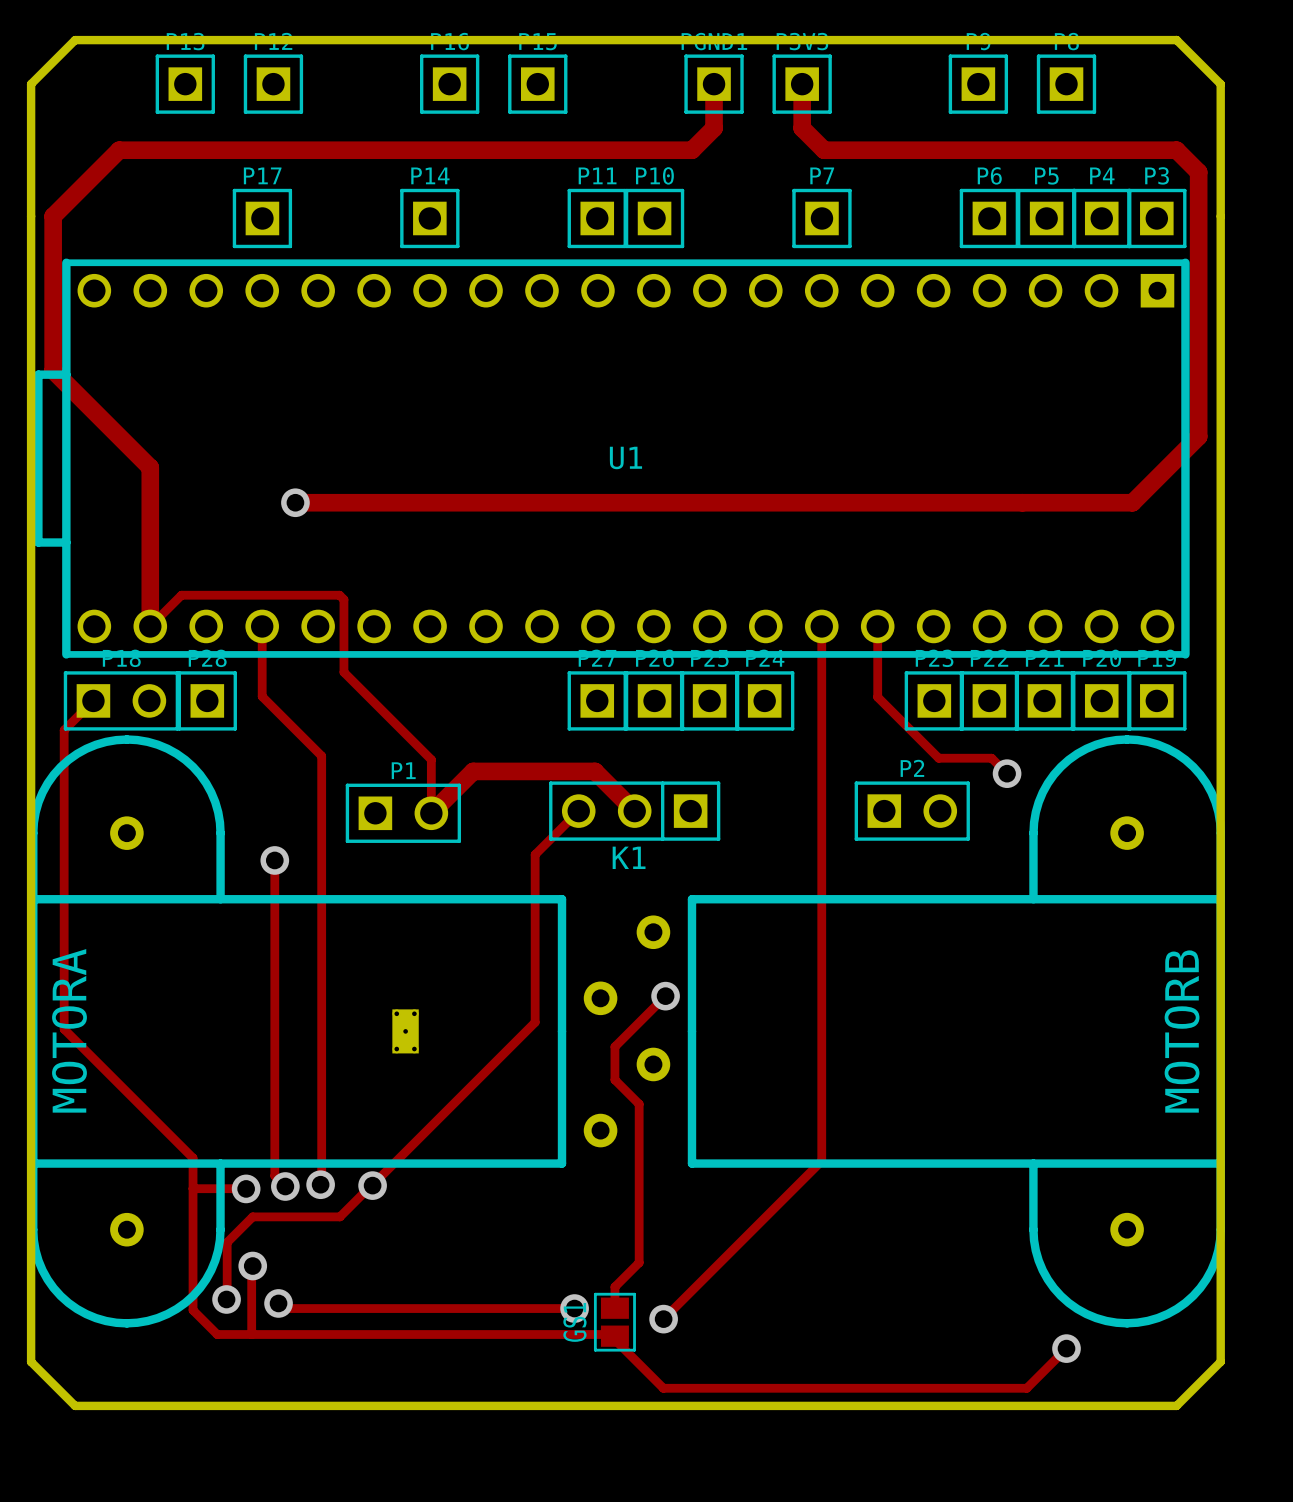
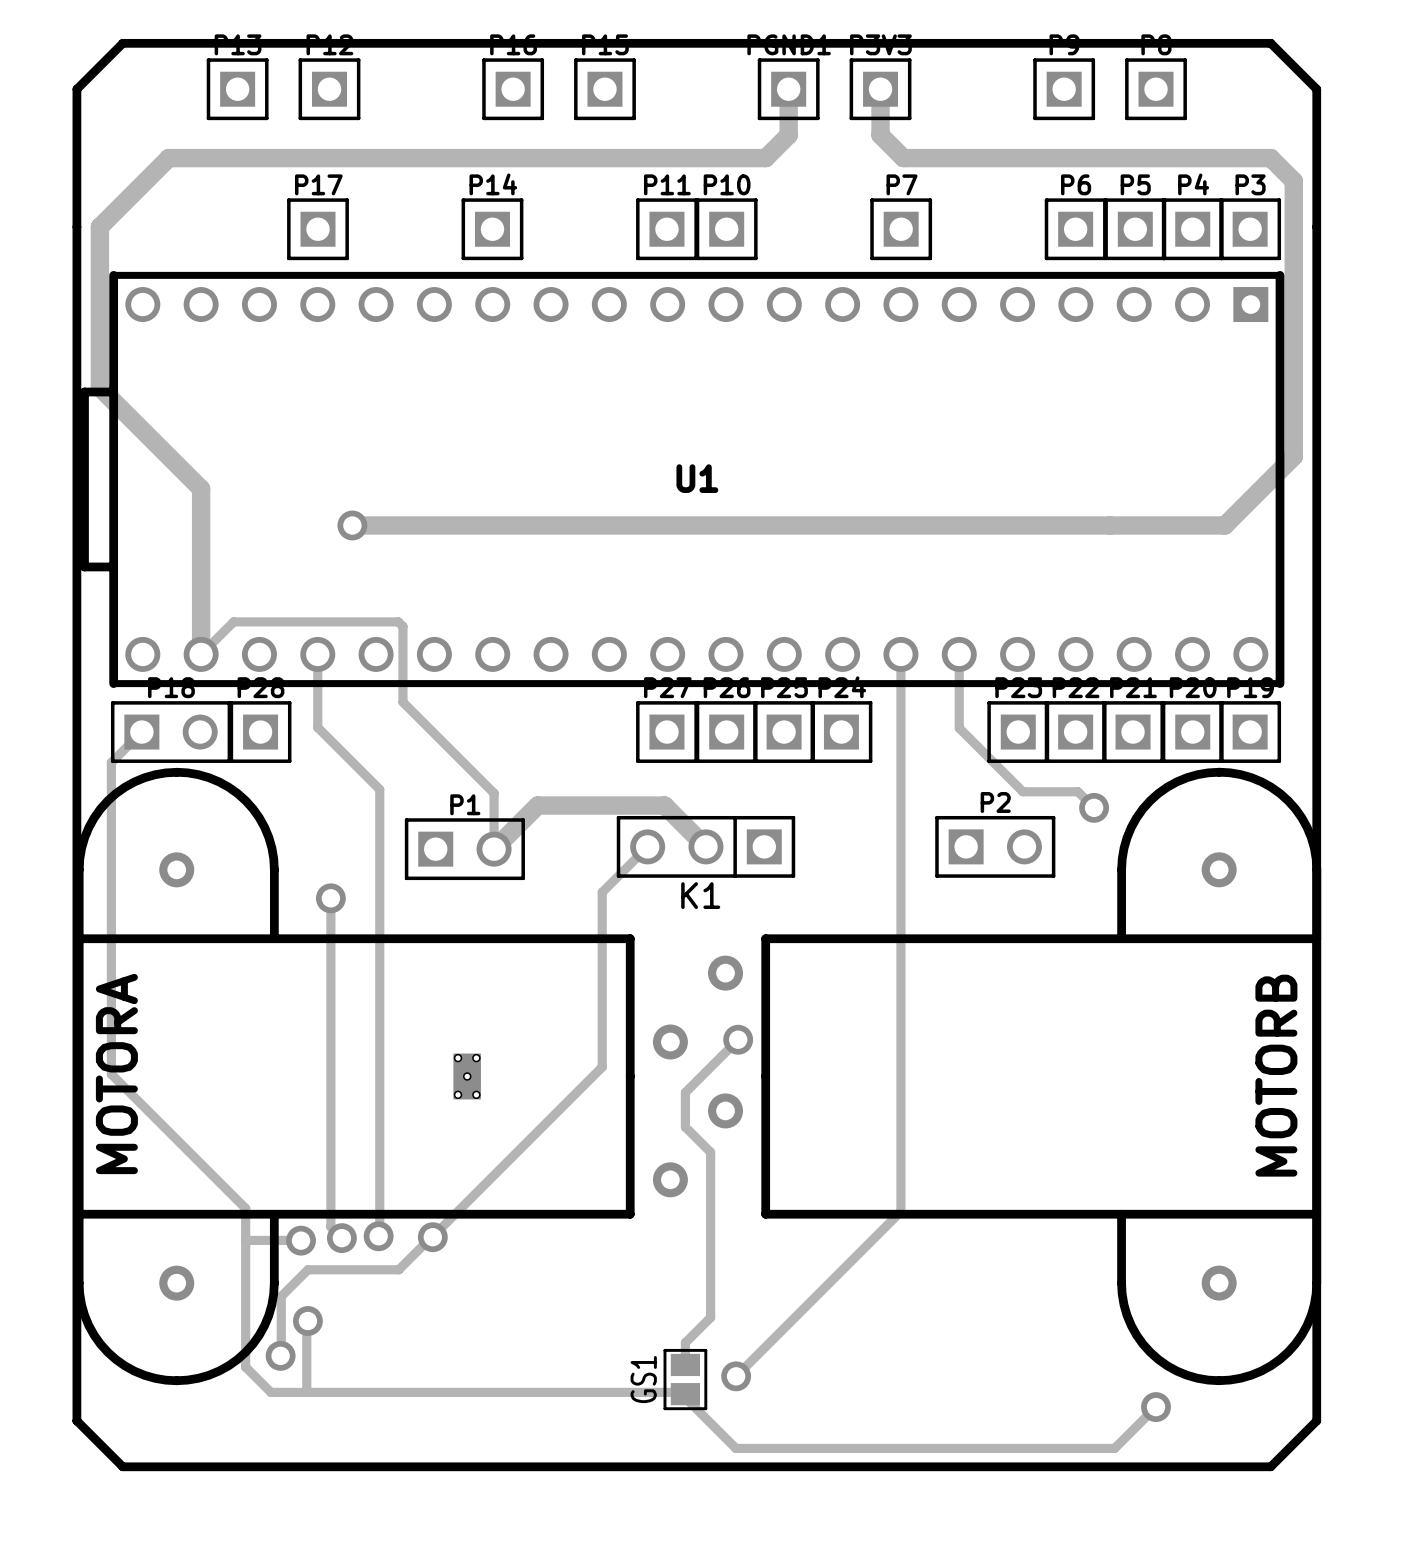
track: (278, 1303) (283, 1308) (574, 1308) -> none
via: (278, 1303) -> none
via: (574, 1308) -> none

